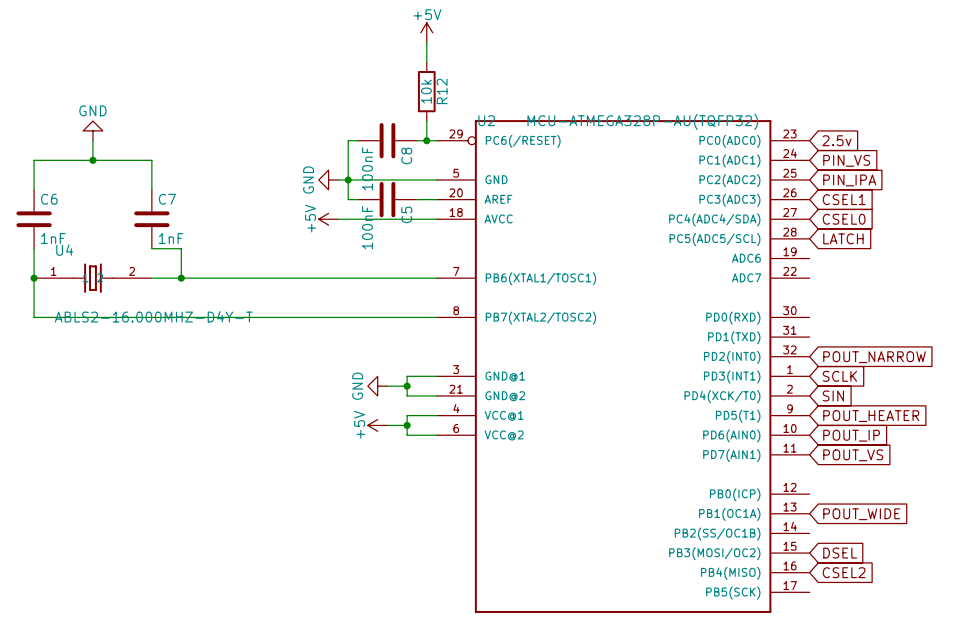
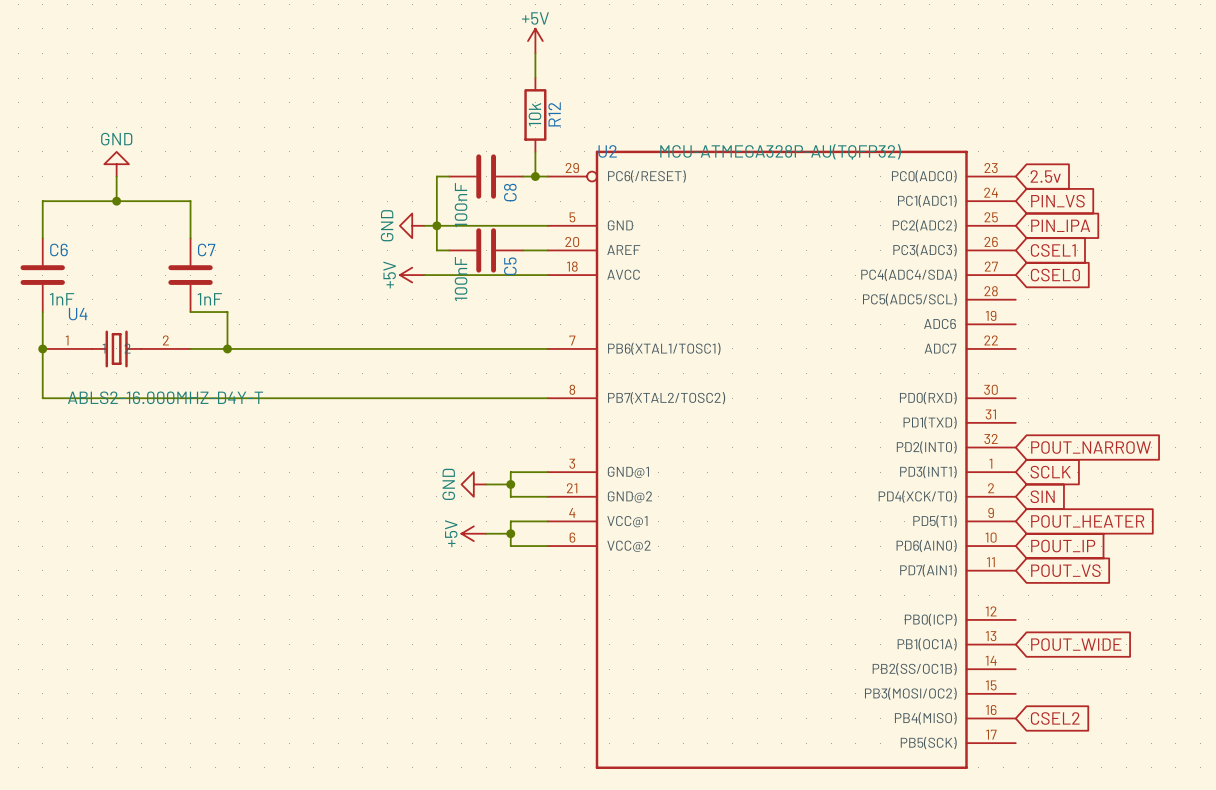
global label: LATCH (843, 238) -> none
global label: DSEL (840, 553) -> none

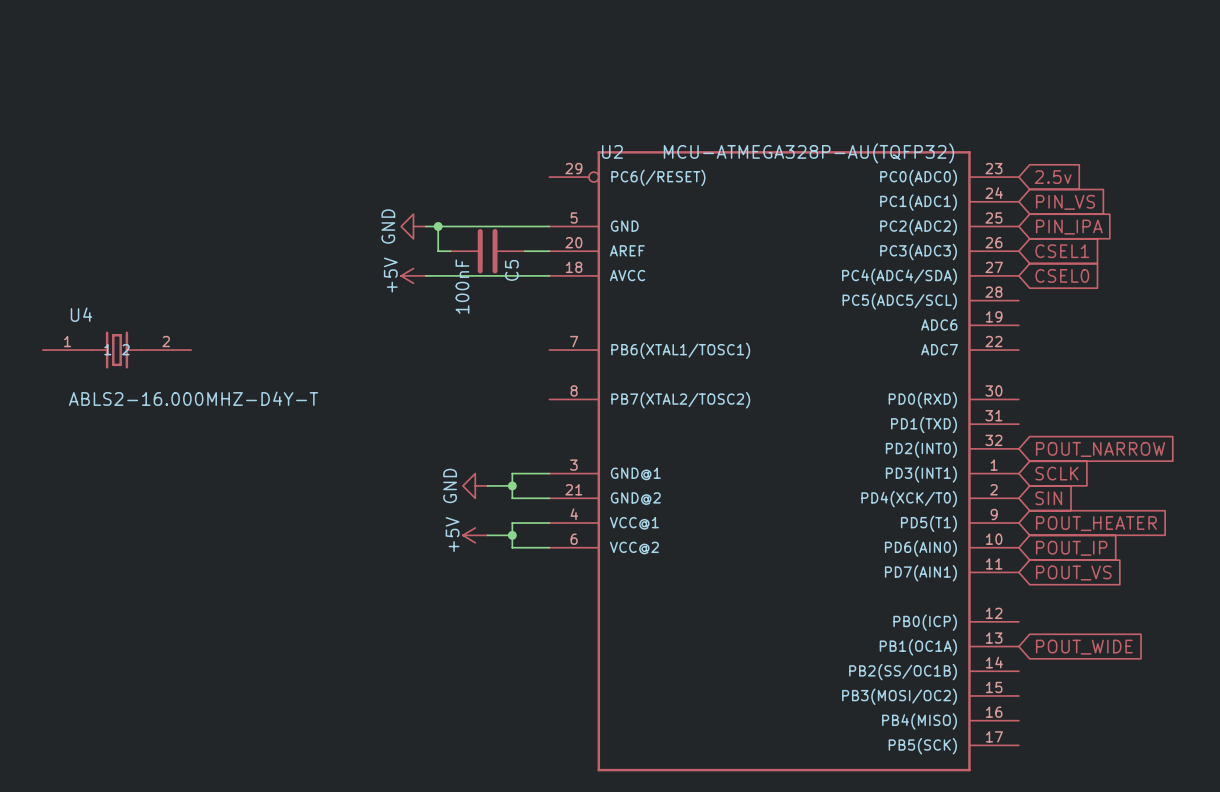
power symbol: +5V (535, 41) -> none
wire: (535, 53) (535, 78) -> none
R12: 10k (535, 114) -> none
wire: (535, 151) (535, 176) -> none
power symbol: GND (116, 164) -> none
wire: (116, 176) (116, 201) -> none
wire: (449, 176) (436, 176) (436, 225) -> none
C8: 100nF (486, 176) -> none
wire: (523, 176) (547, 176) -> none
junction: (535, 176) -> none
junction: (116, 201) -> none
wire: (42, 238) (42, 201) (190, 201) (190, 238) -> none
C6: 1nF (42, 275) -> none
C7: 1nF (190, 275) -> none
wire: (42, 312) (42, 398) (547, 398) -> none
wire: (190, 312) (227, 312) (227, 348) -> none
junction: (42, 348) -> none
wire: (190, 348) (547, 348) -> none
junction: (227, 348) -> none
global label: CSEL2 (1055, 718) -> none

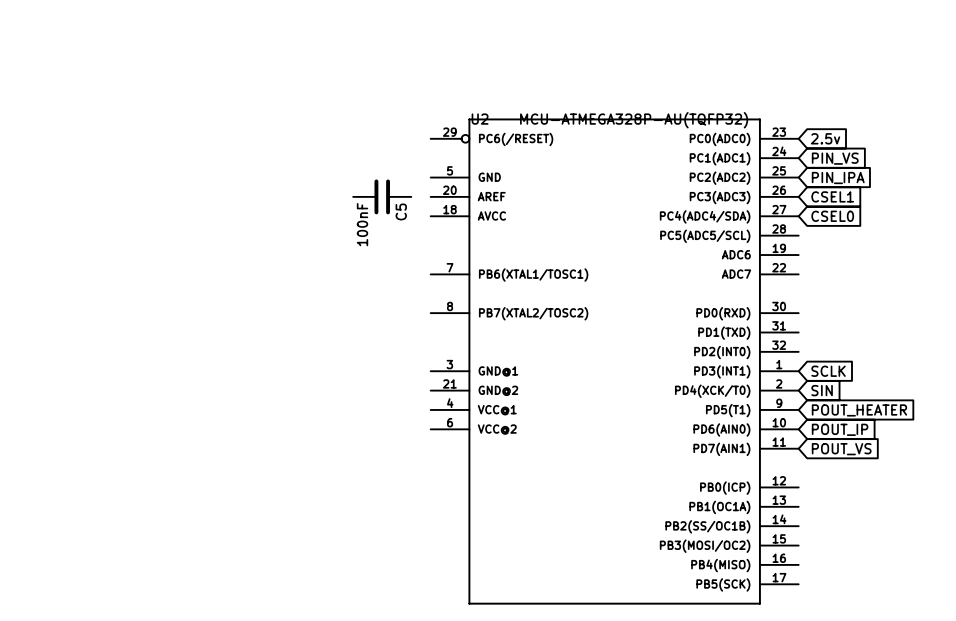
power symbol: GND (413, 226) -> none
wire: (425, 226) (549, 226) -> none
wire: (438, 226) (438, 251) (450, 251) -> none
junction: (438, 226) -> none
wire: (524, 251) (549, 251) -> none
power symbol: +5V (413, 275) -> none
wire: (425, 275) (549, 275) -> none
U4: ABLS2-16.000MHZ-D4Y-T (116, 350) -> none
global label: POUT_NARROW (1100, 449) -> none
wire: (549, 473) (512, 473) (512, 498) (549, 498) -> none
power symbol: GND (475, 485) -> none
wire: (487, 485) (512, 485) -> none
junction: (512, 485) -> none
wire: (549, 523) (512, 523) (512, 547) (549, 547) -> none
power symbol: +5V (475, 535) -> none
wire: (487, 535) (512, 535) -> none
junction: (512, 535) -> none
global label: POUT_WIDE (1084, 647) -> none

